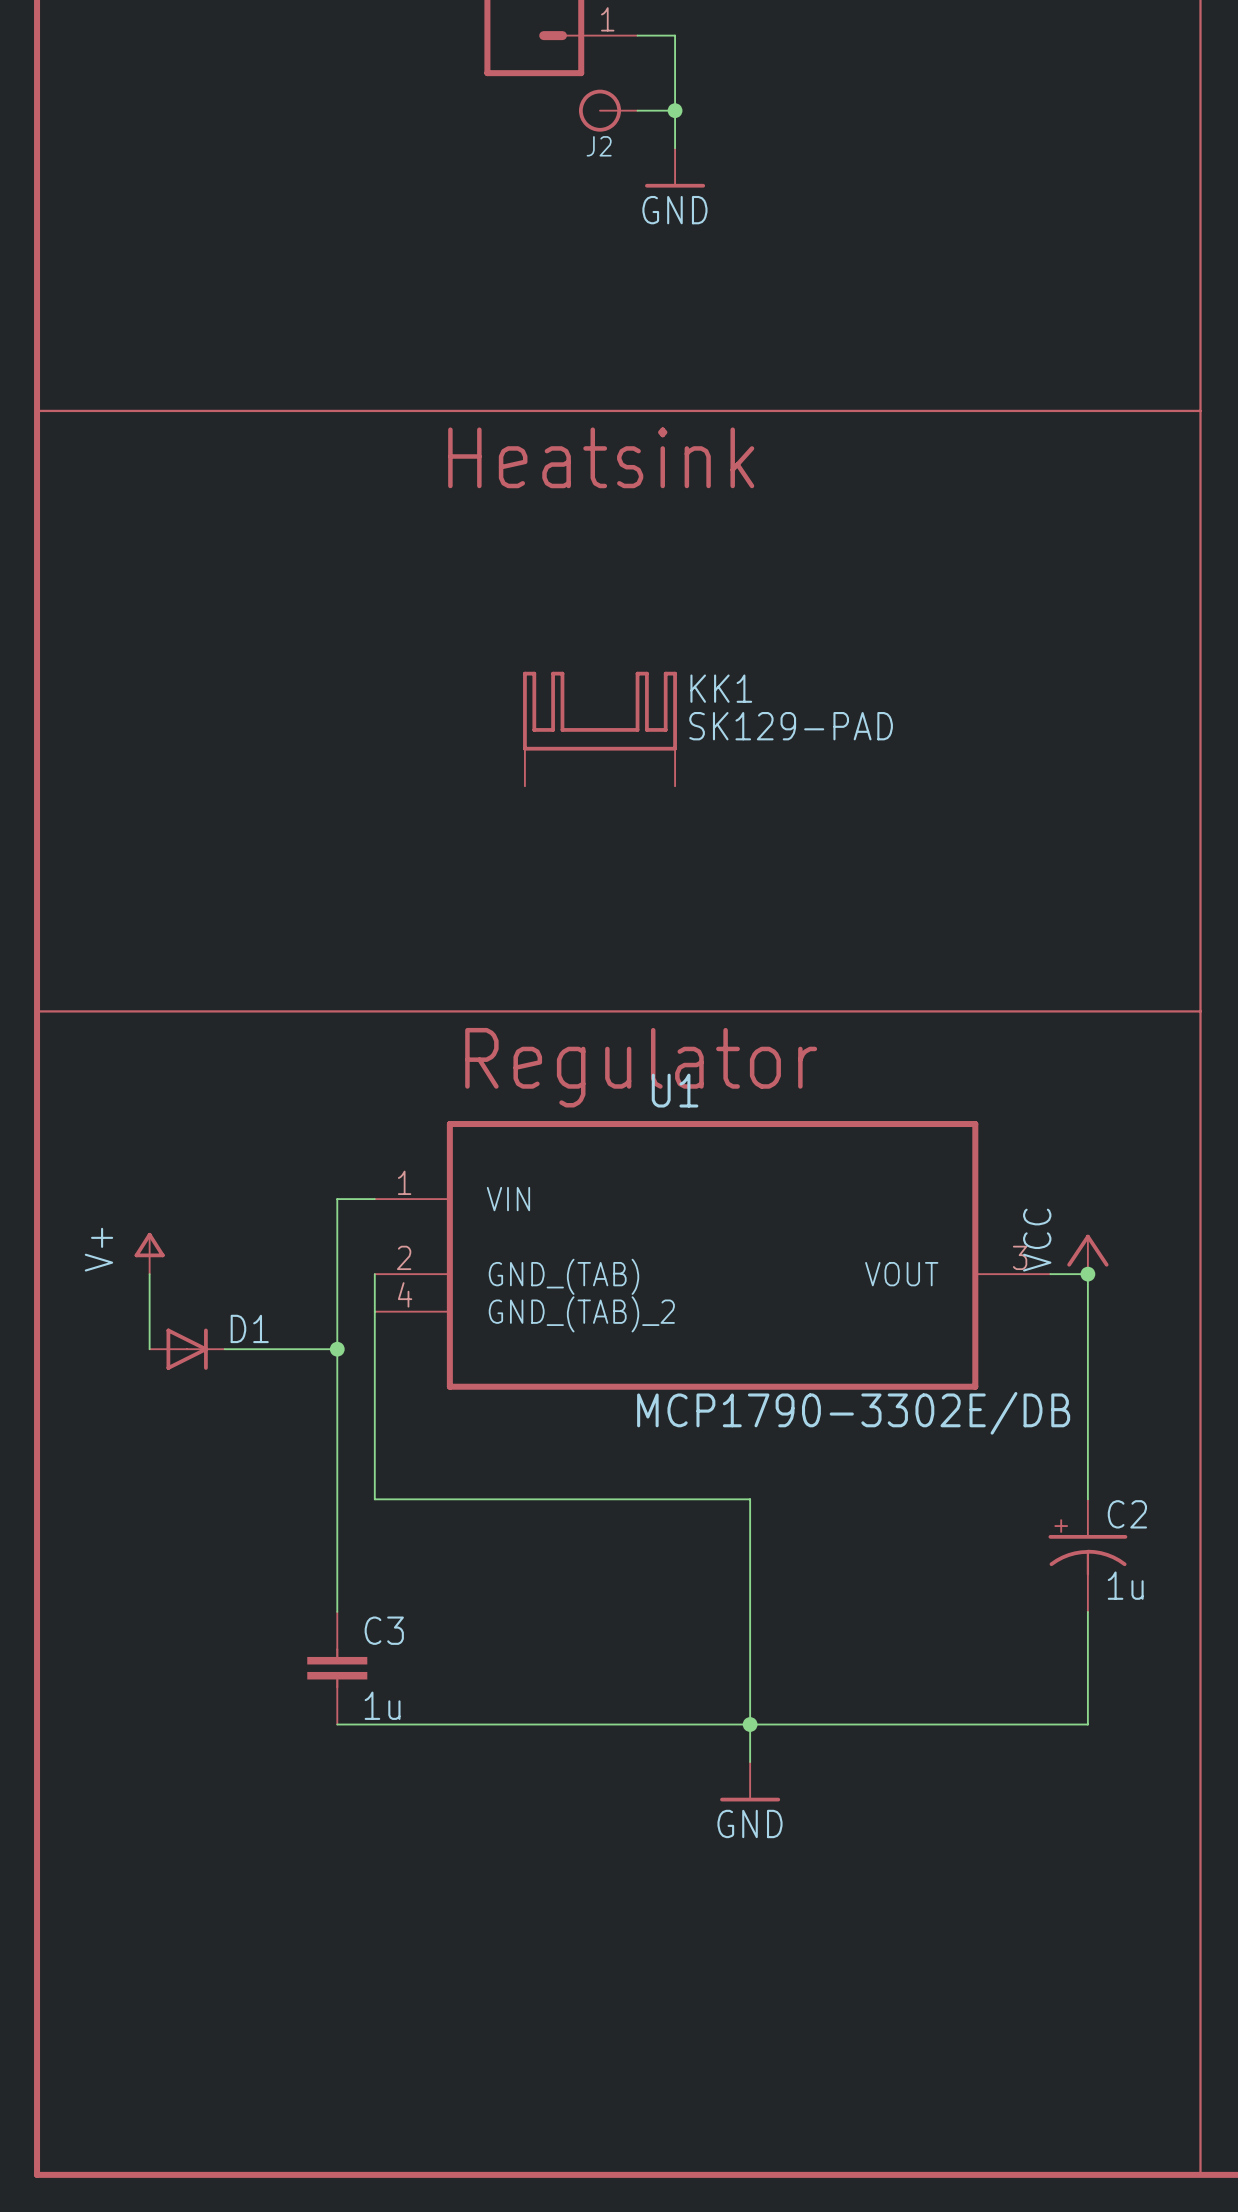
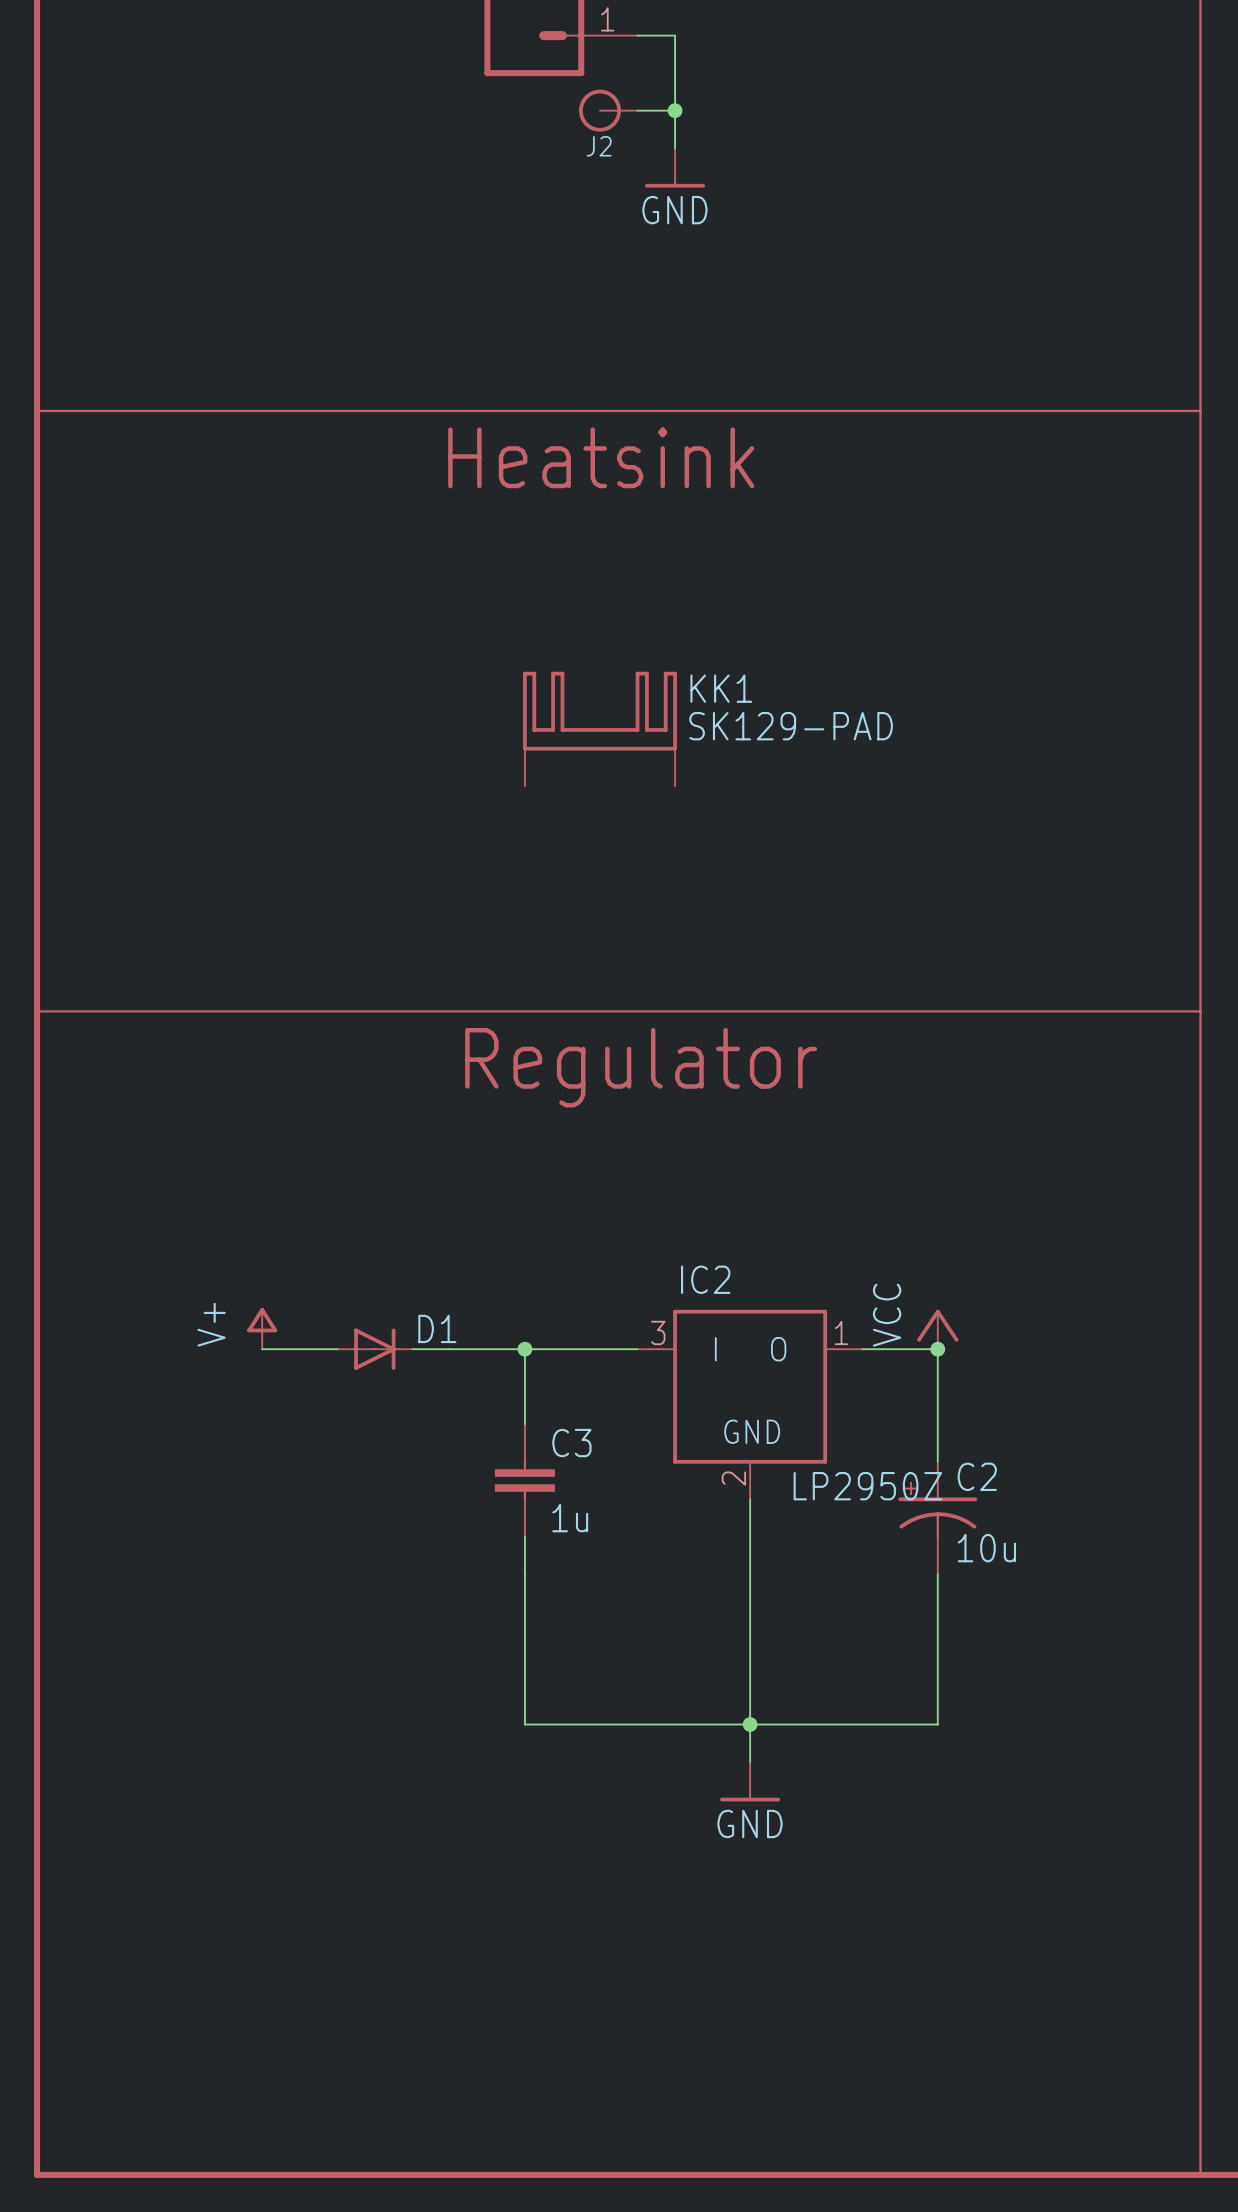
wire: (374, 1199) (337, 1199) (337, 1611) -> none
power symbol position: V+ (149, 1253) -> V+ (262, 1328)
power symbol position: VCC (1087, 1254) -> VCC (937, 1329)
U1: MCP1790-3302E/DB (712, 1255) -> none
wire: (149, 1274) (149, 1349) -> none
wire: (374, 1274) (374, 1499) (750, 1499) -> none
wire: (1050, 1274) (1087, 1274) (1087, 1499) -> none
junction: (1087, 1274) -> none
D1 position: (187, 1349) -> (374, 1349)
wire: (224, 1349) (262, 1349) -> none
junction: (337, 1349) -> none
wire: none -> (412, 1349) (637, 1349)
wire: none -> (524, 1349) (524, 1424)
junction: none -> (524, 1349)
wire: none -> (862, 1349) (937, 1349) (937, 1461)
junction: none -> (937, 1349)
IC2: none -> LP2950Z (750, 1404)
C2 position: (1087, 1555) -> (937, 1518)
C2 value: 1u (1125, 1585) -> 10u (986, 1548)
wire: (1087, 1611) (1087, 1724) (937, 1724) -> (937, 1574) (937, 1724)
C3 position: (337, 1668) -> (524, 1480)
wire: (337, 1724) (524, 1724) -> (524, 1536) (524, 1724)

